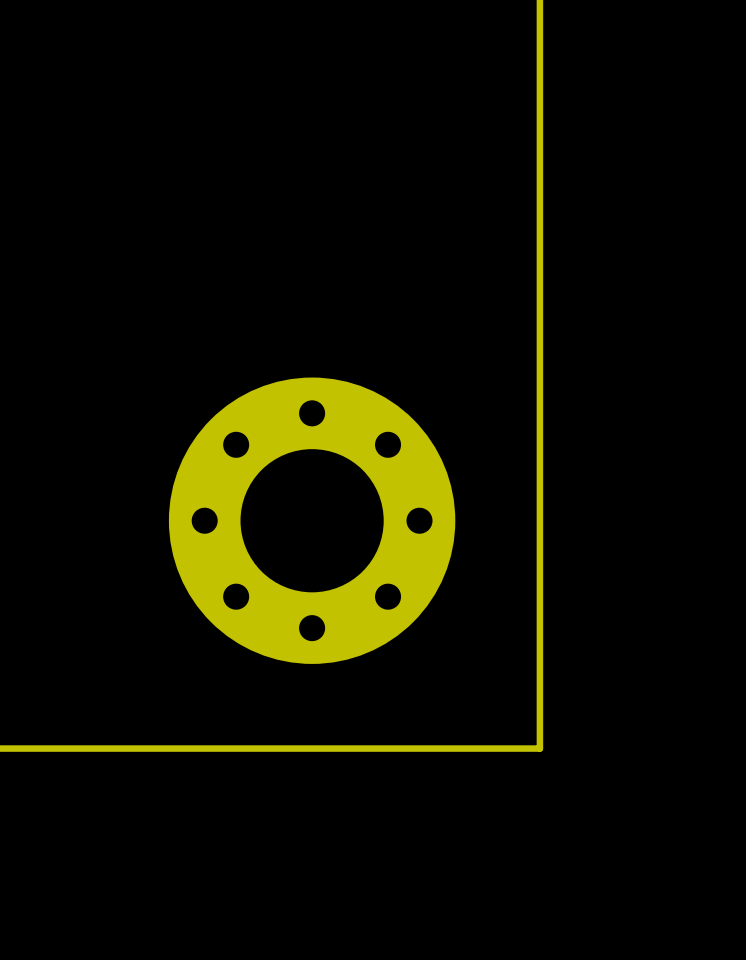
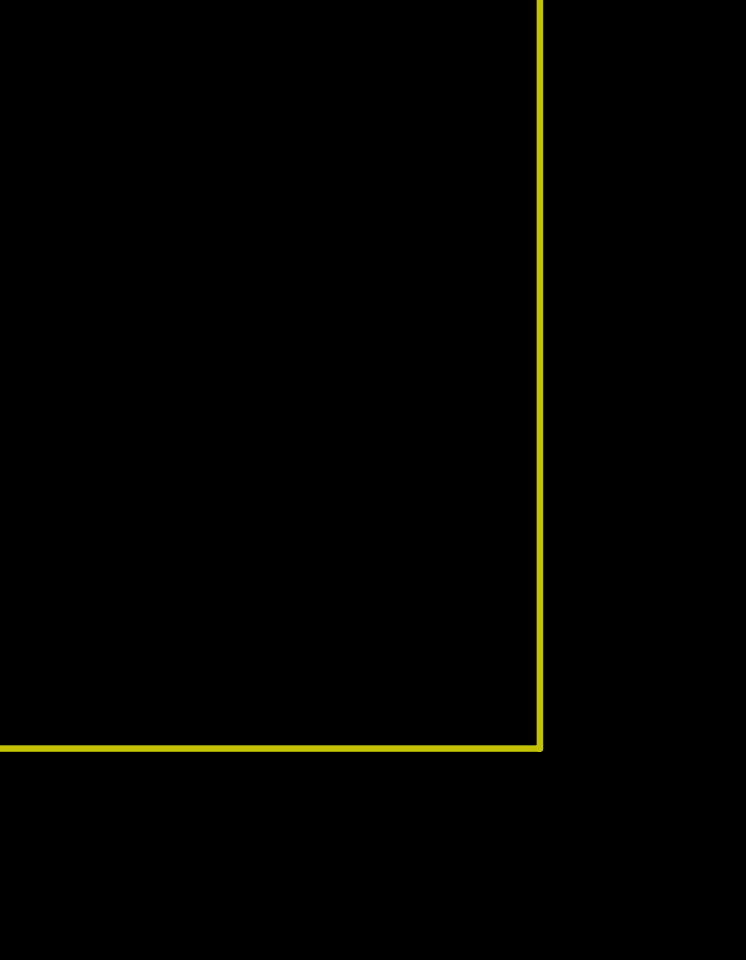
part: (312, 520) -> none

